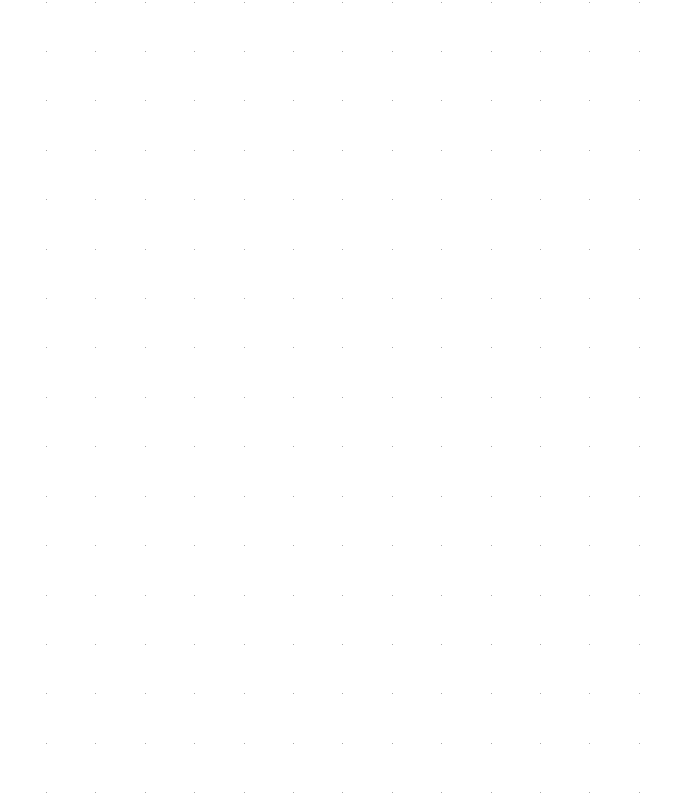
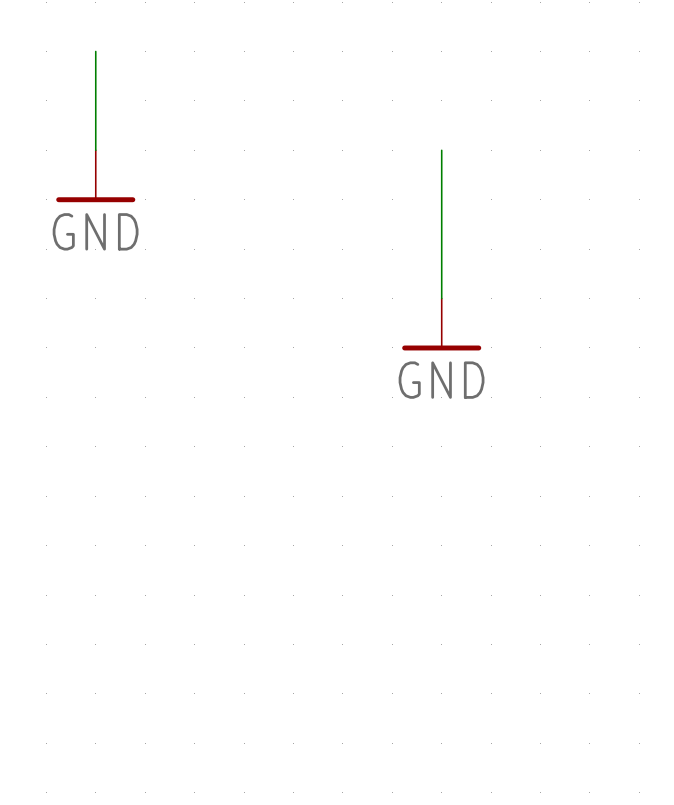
wire: none -> (95, 51) (95, 150)
wire: none -> (441, 150) (441, 298)
power symbol: none -> GND (95, 176)
power symbol: none -> GND (441, 324)

